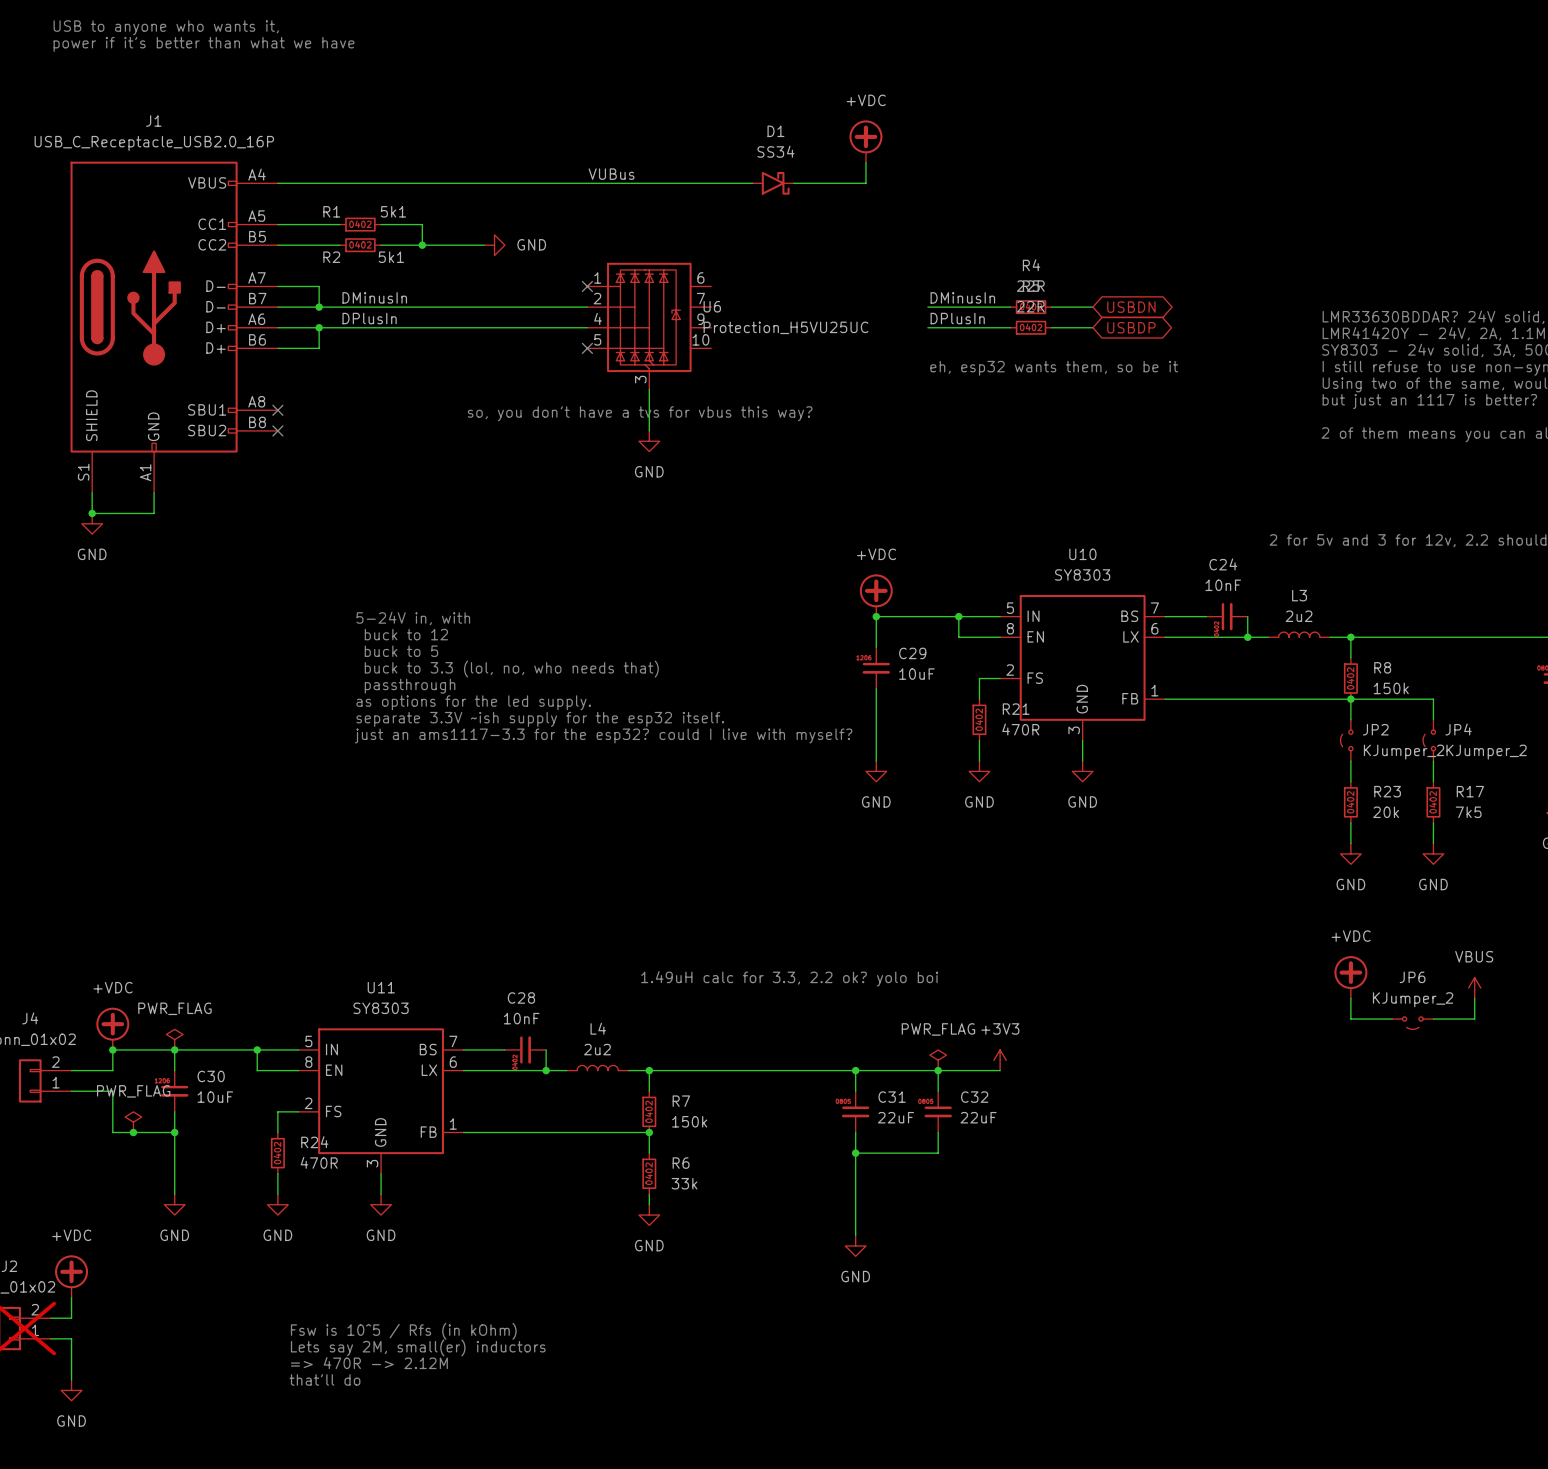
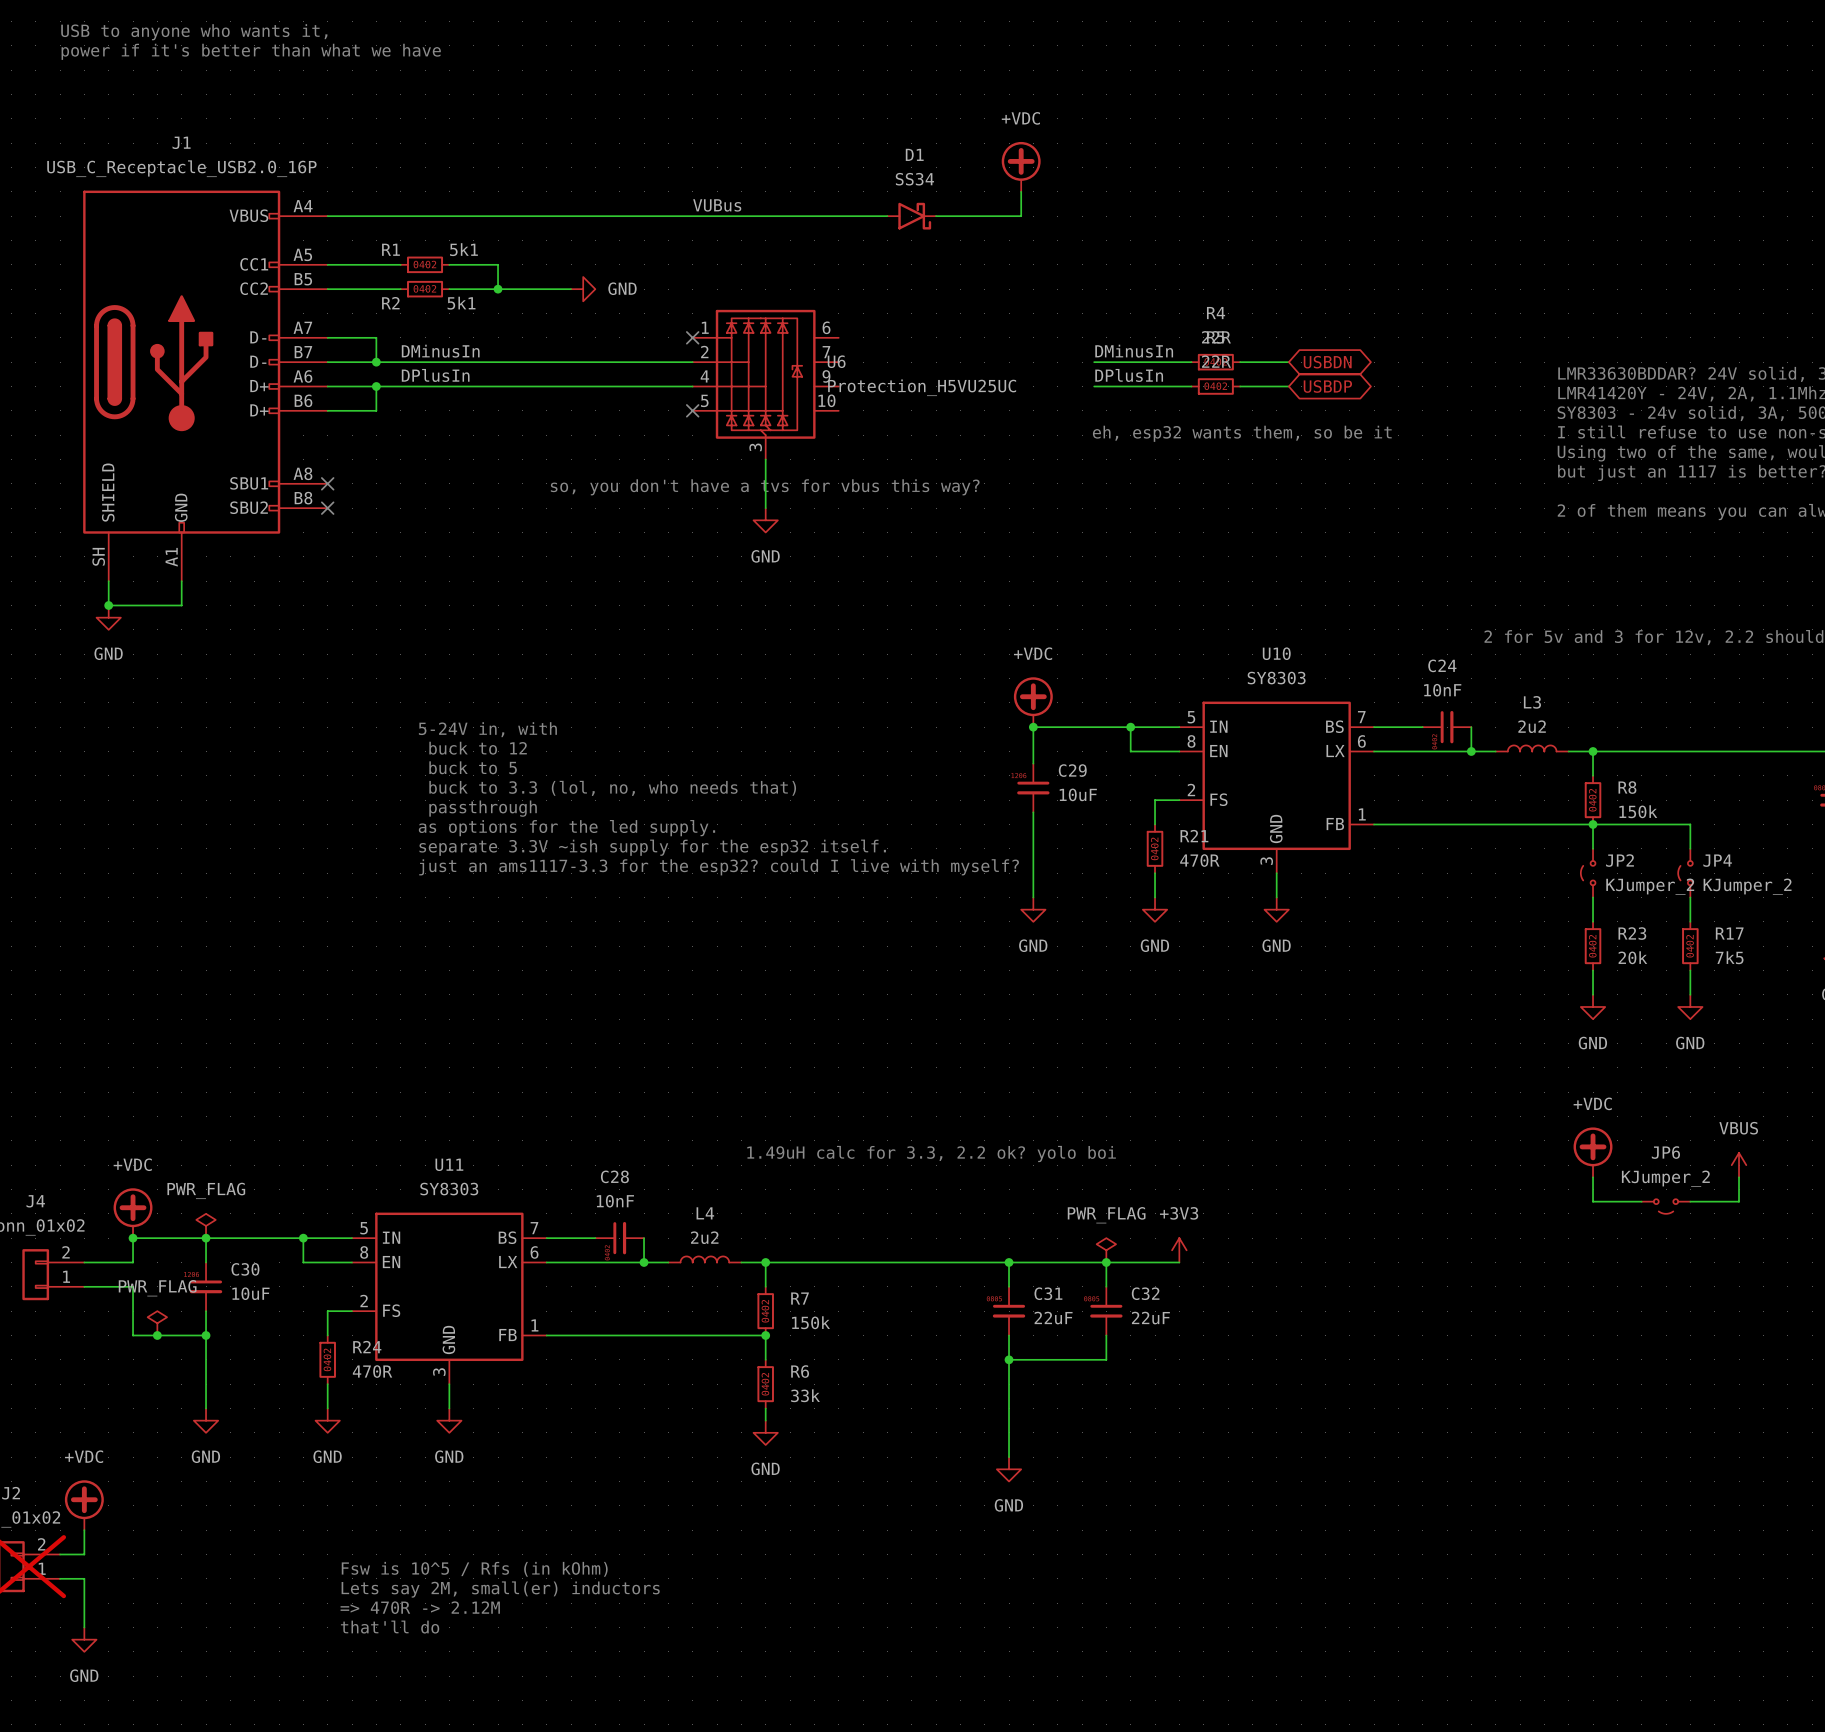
J1 pin number: S1 (83, 472) -> SH (98, 556)

